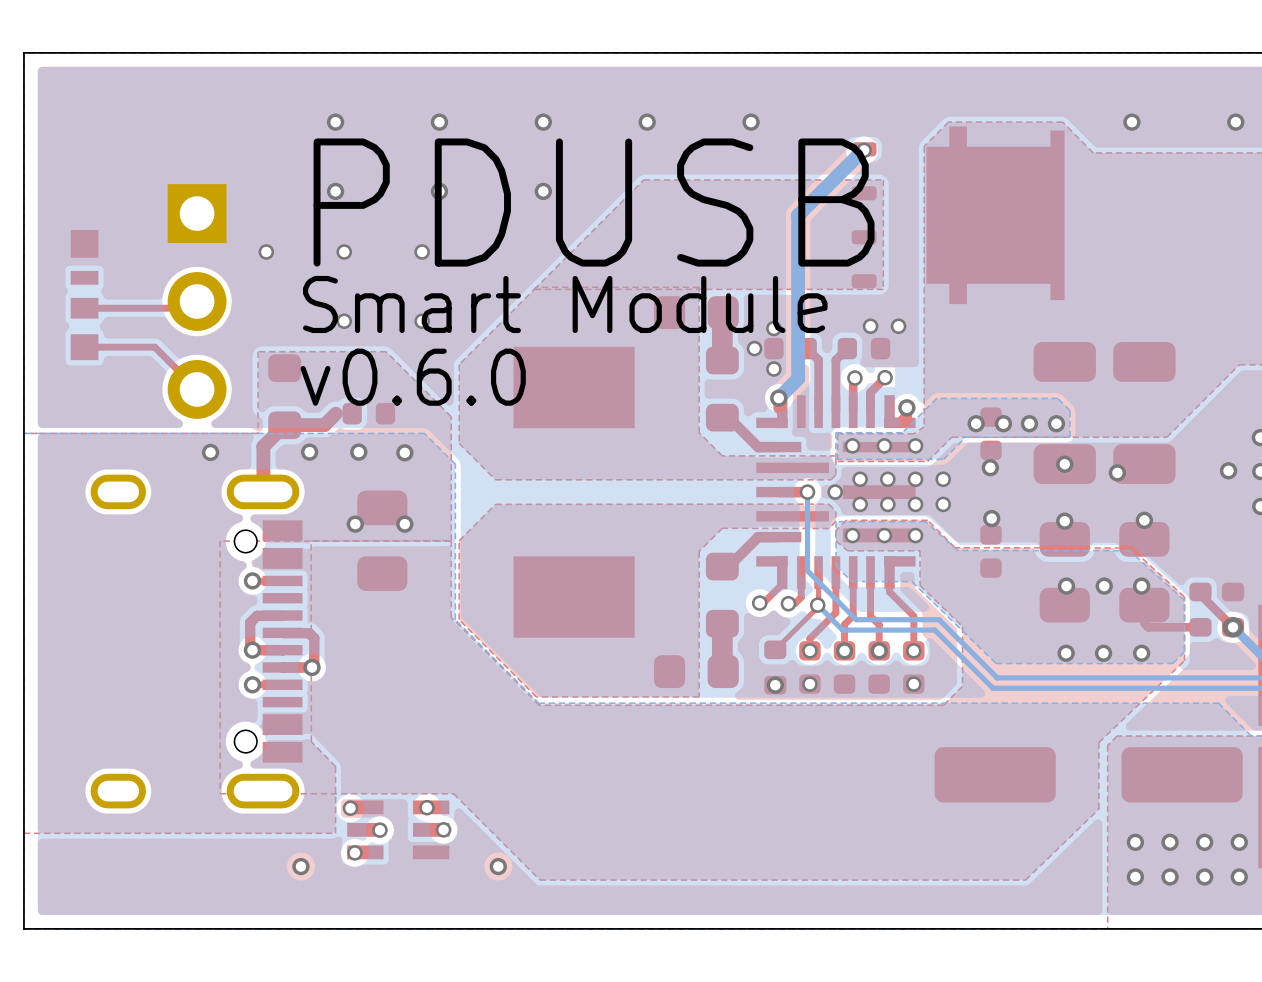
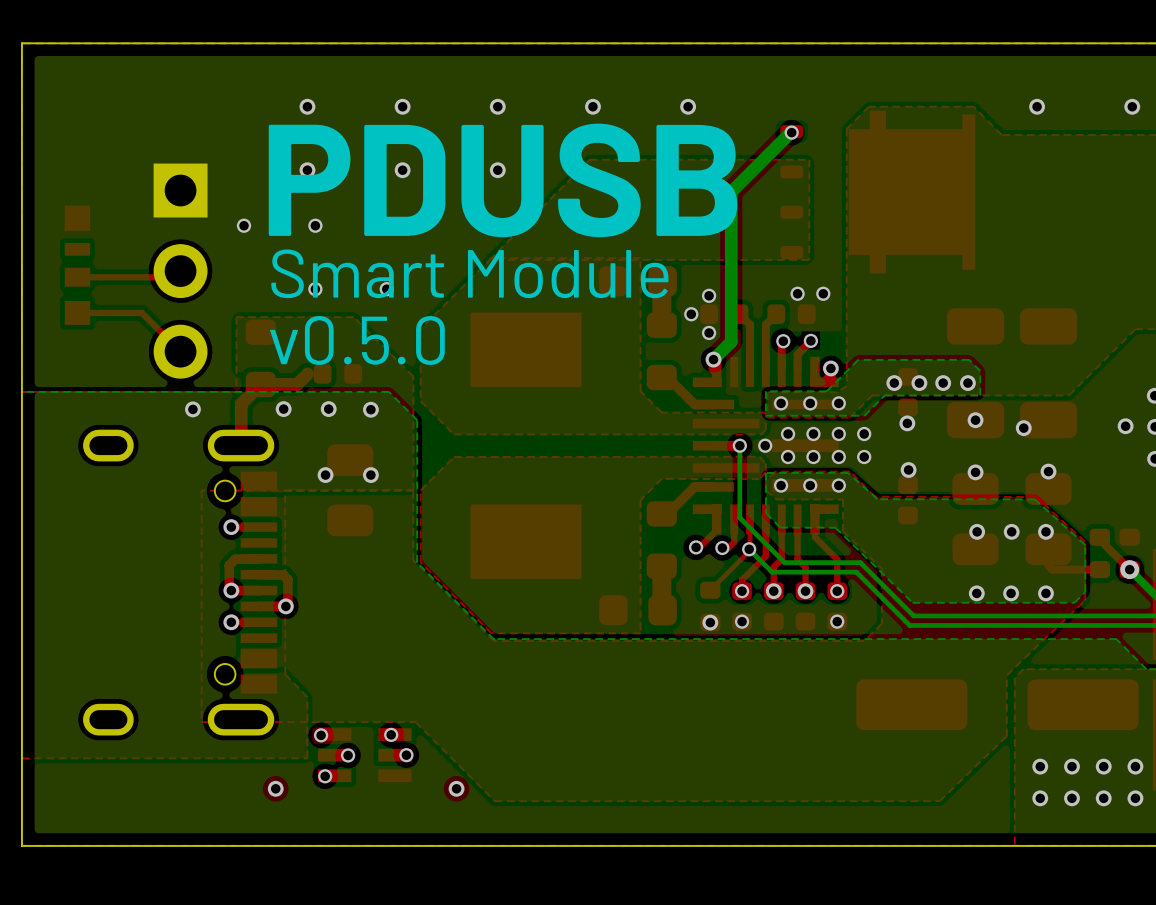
text: v0.6.0 (413, 377) -> v0.5.0 (357, 340)

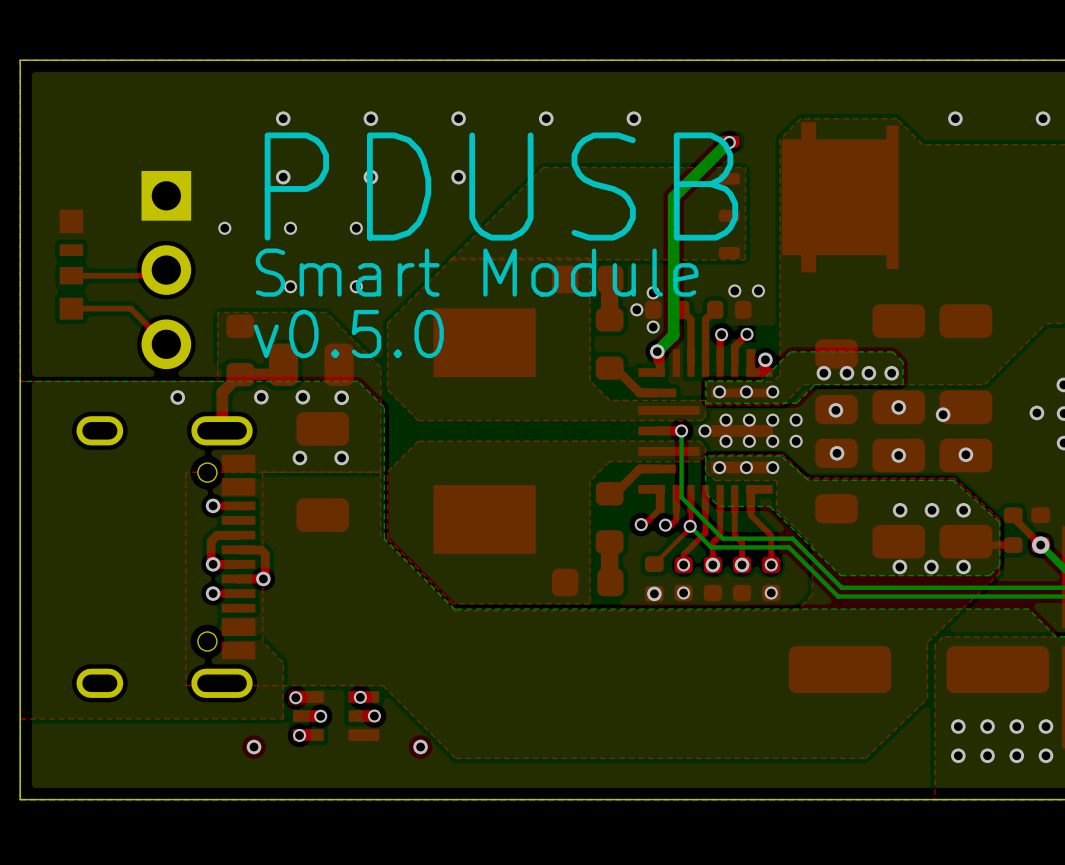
part footprint: [313, 364, 363, 384] -> [268, 343, 354, 386]
part footprint: [898, 368, 918, 417] -> [815, 339, 858, 425]
part footprint: [327, 444, 374, 537] -> [296, 412, 349, 532]
part footprint: [952, 473, 999, 566] -> [872, 438, 926, 559]
part footprint: [1025, 473, 1072, 566] -> [939, 438, 993, 559]
part footprint: [898, 476, 918, 525] -> [815, 438, 858, 524]

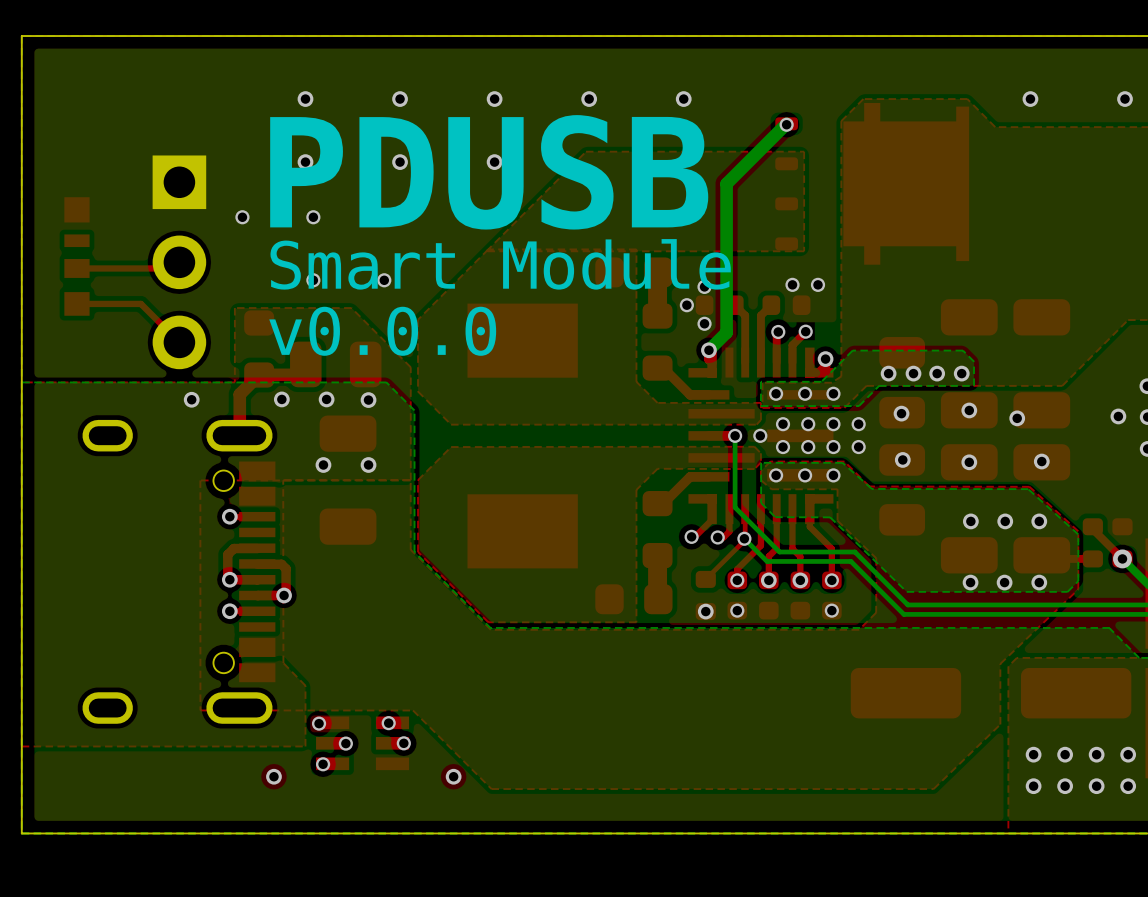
text: v0.5.0 (348, 333) -> v0.0.0 (382, 331)

